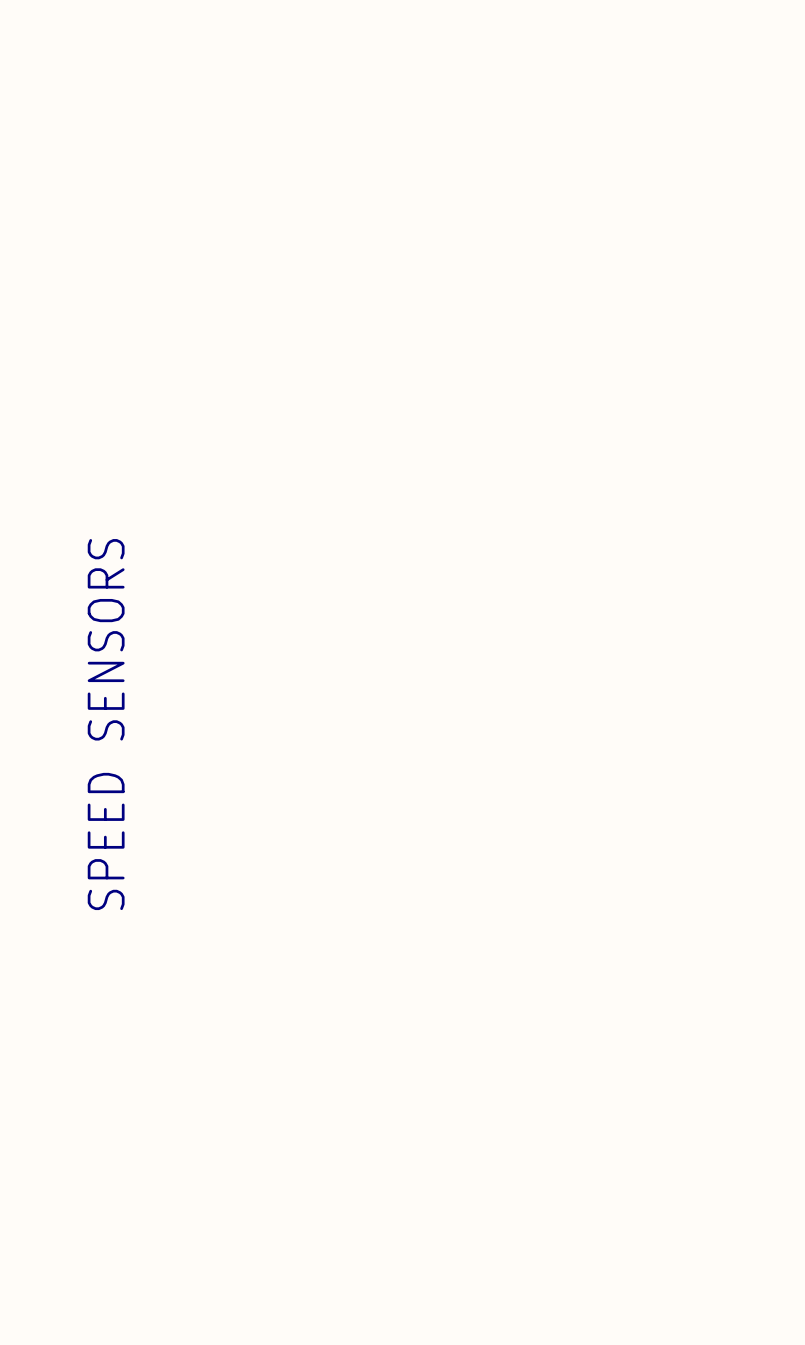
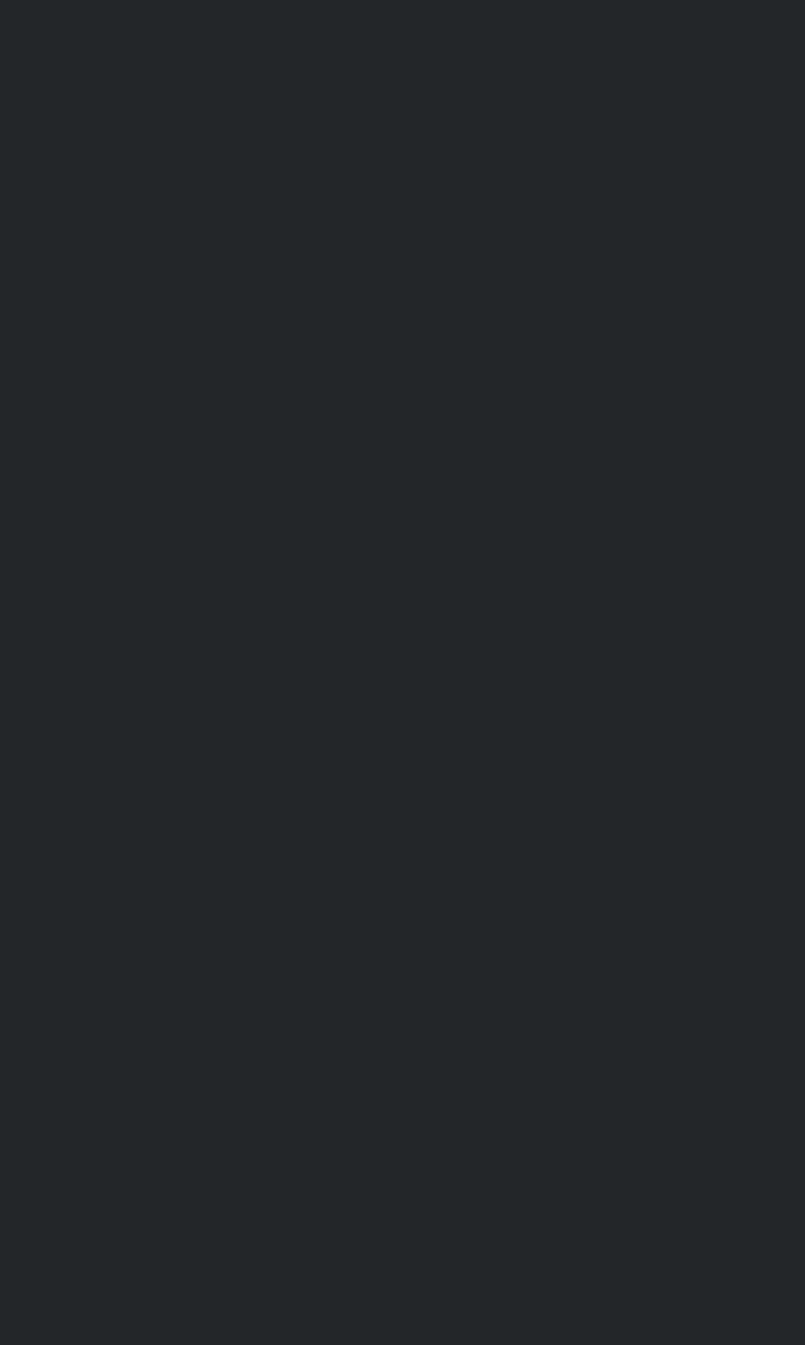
text: SPEED SENSORS (106, 724) -> none

